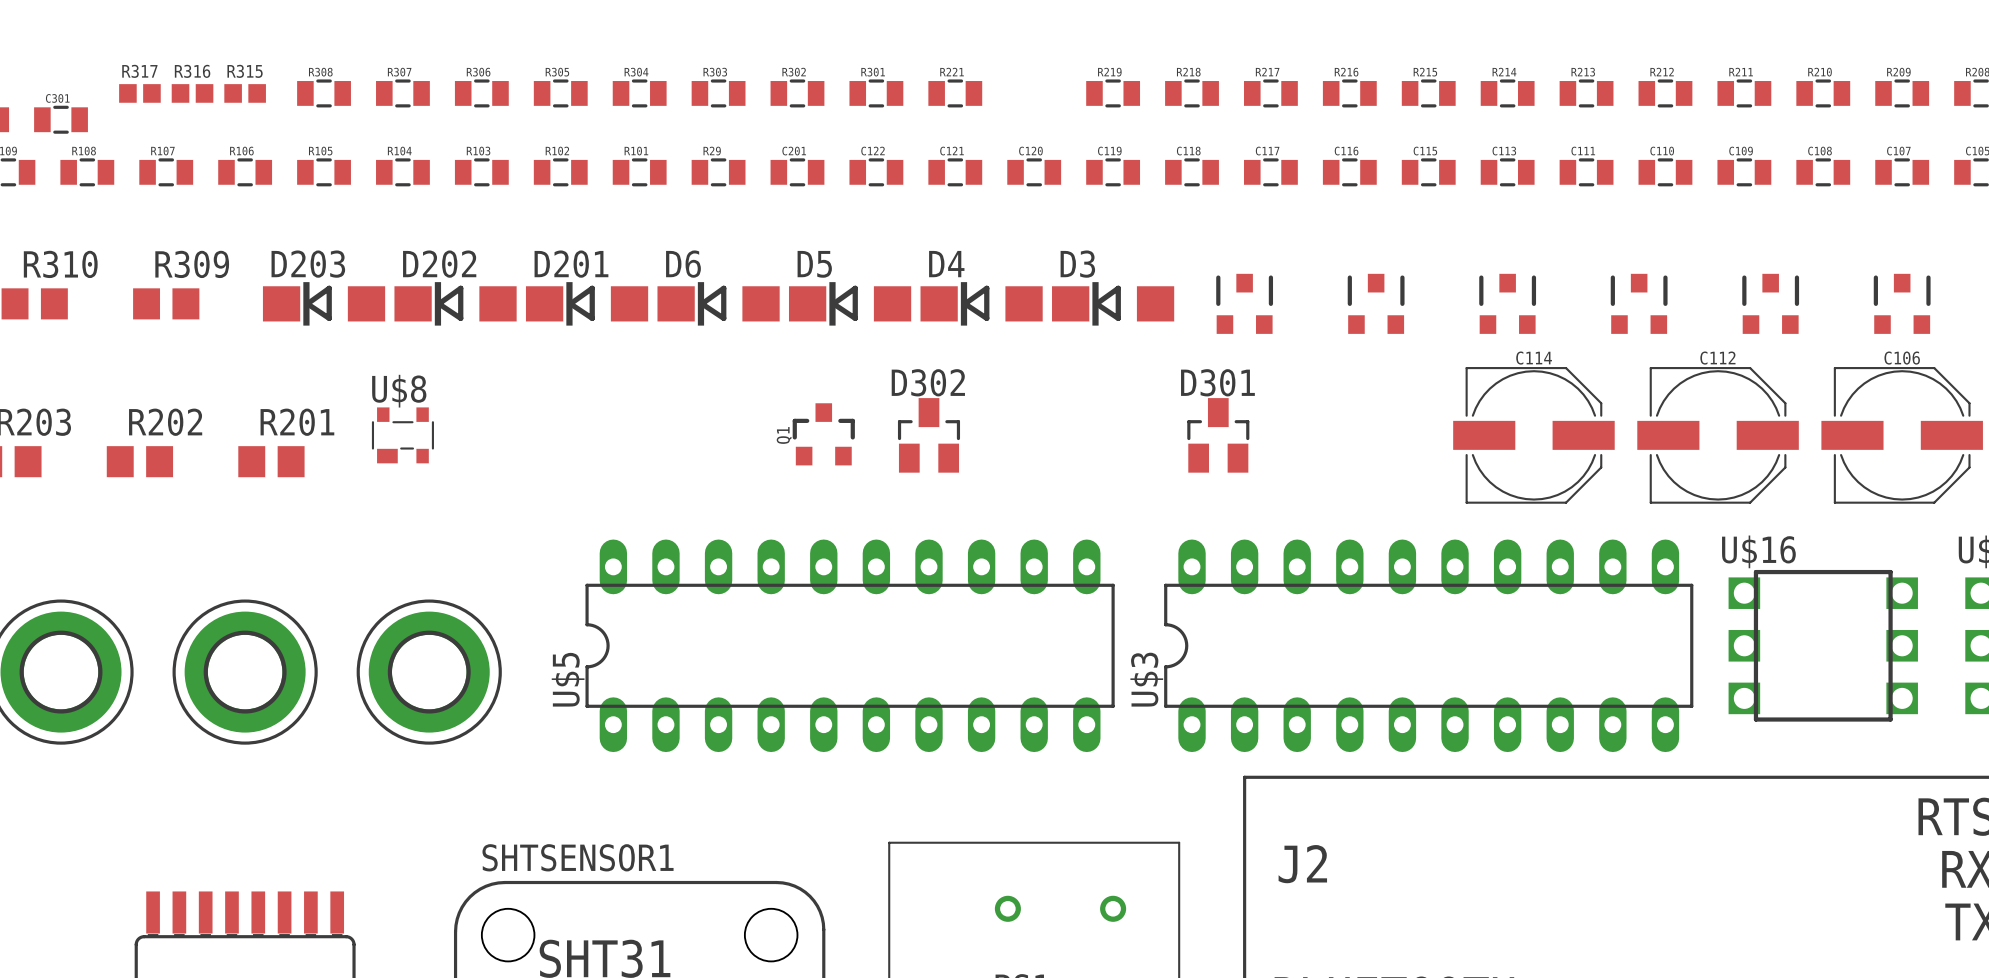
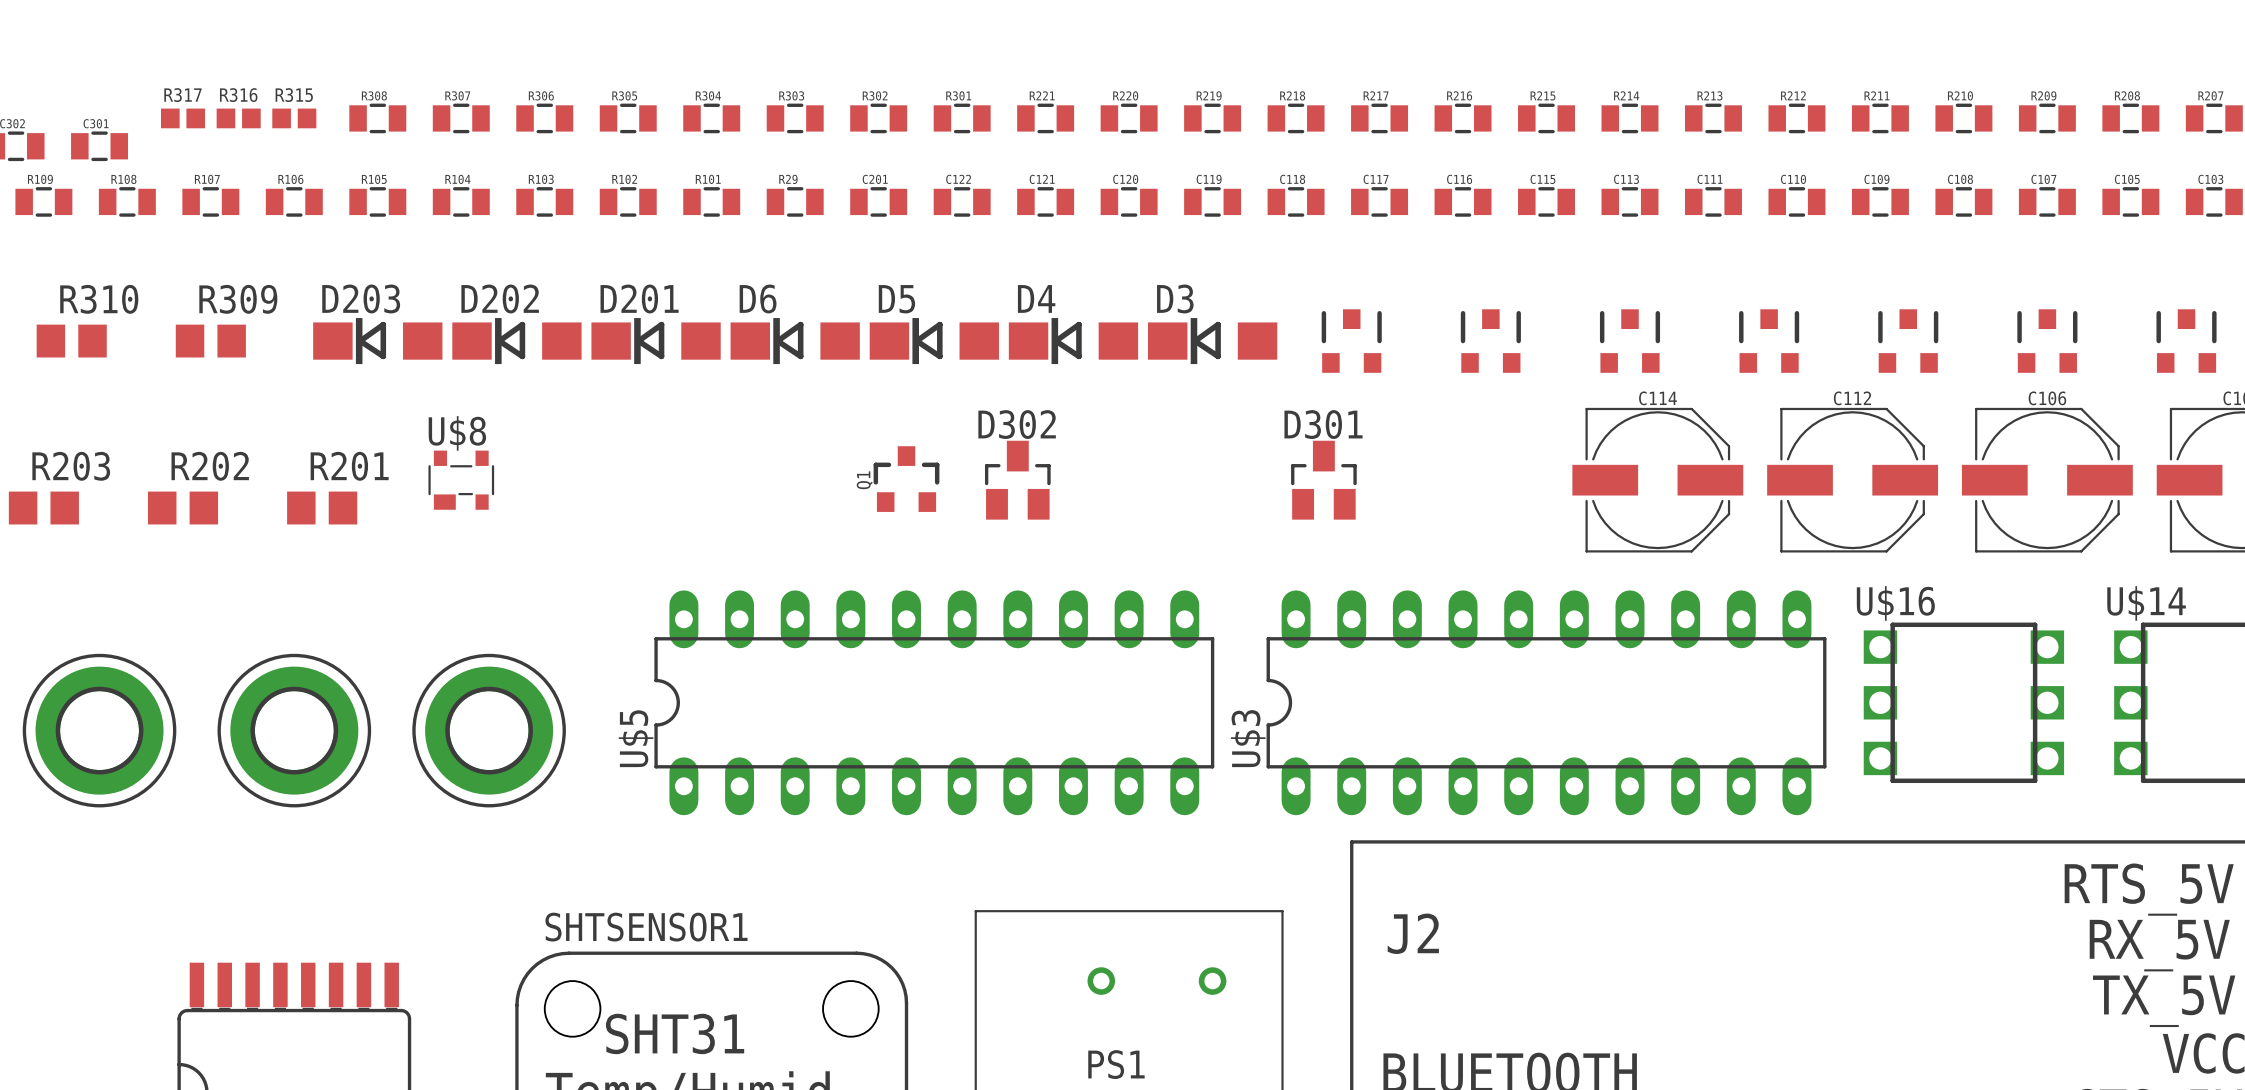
R220: none -> (1129, 118)

